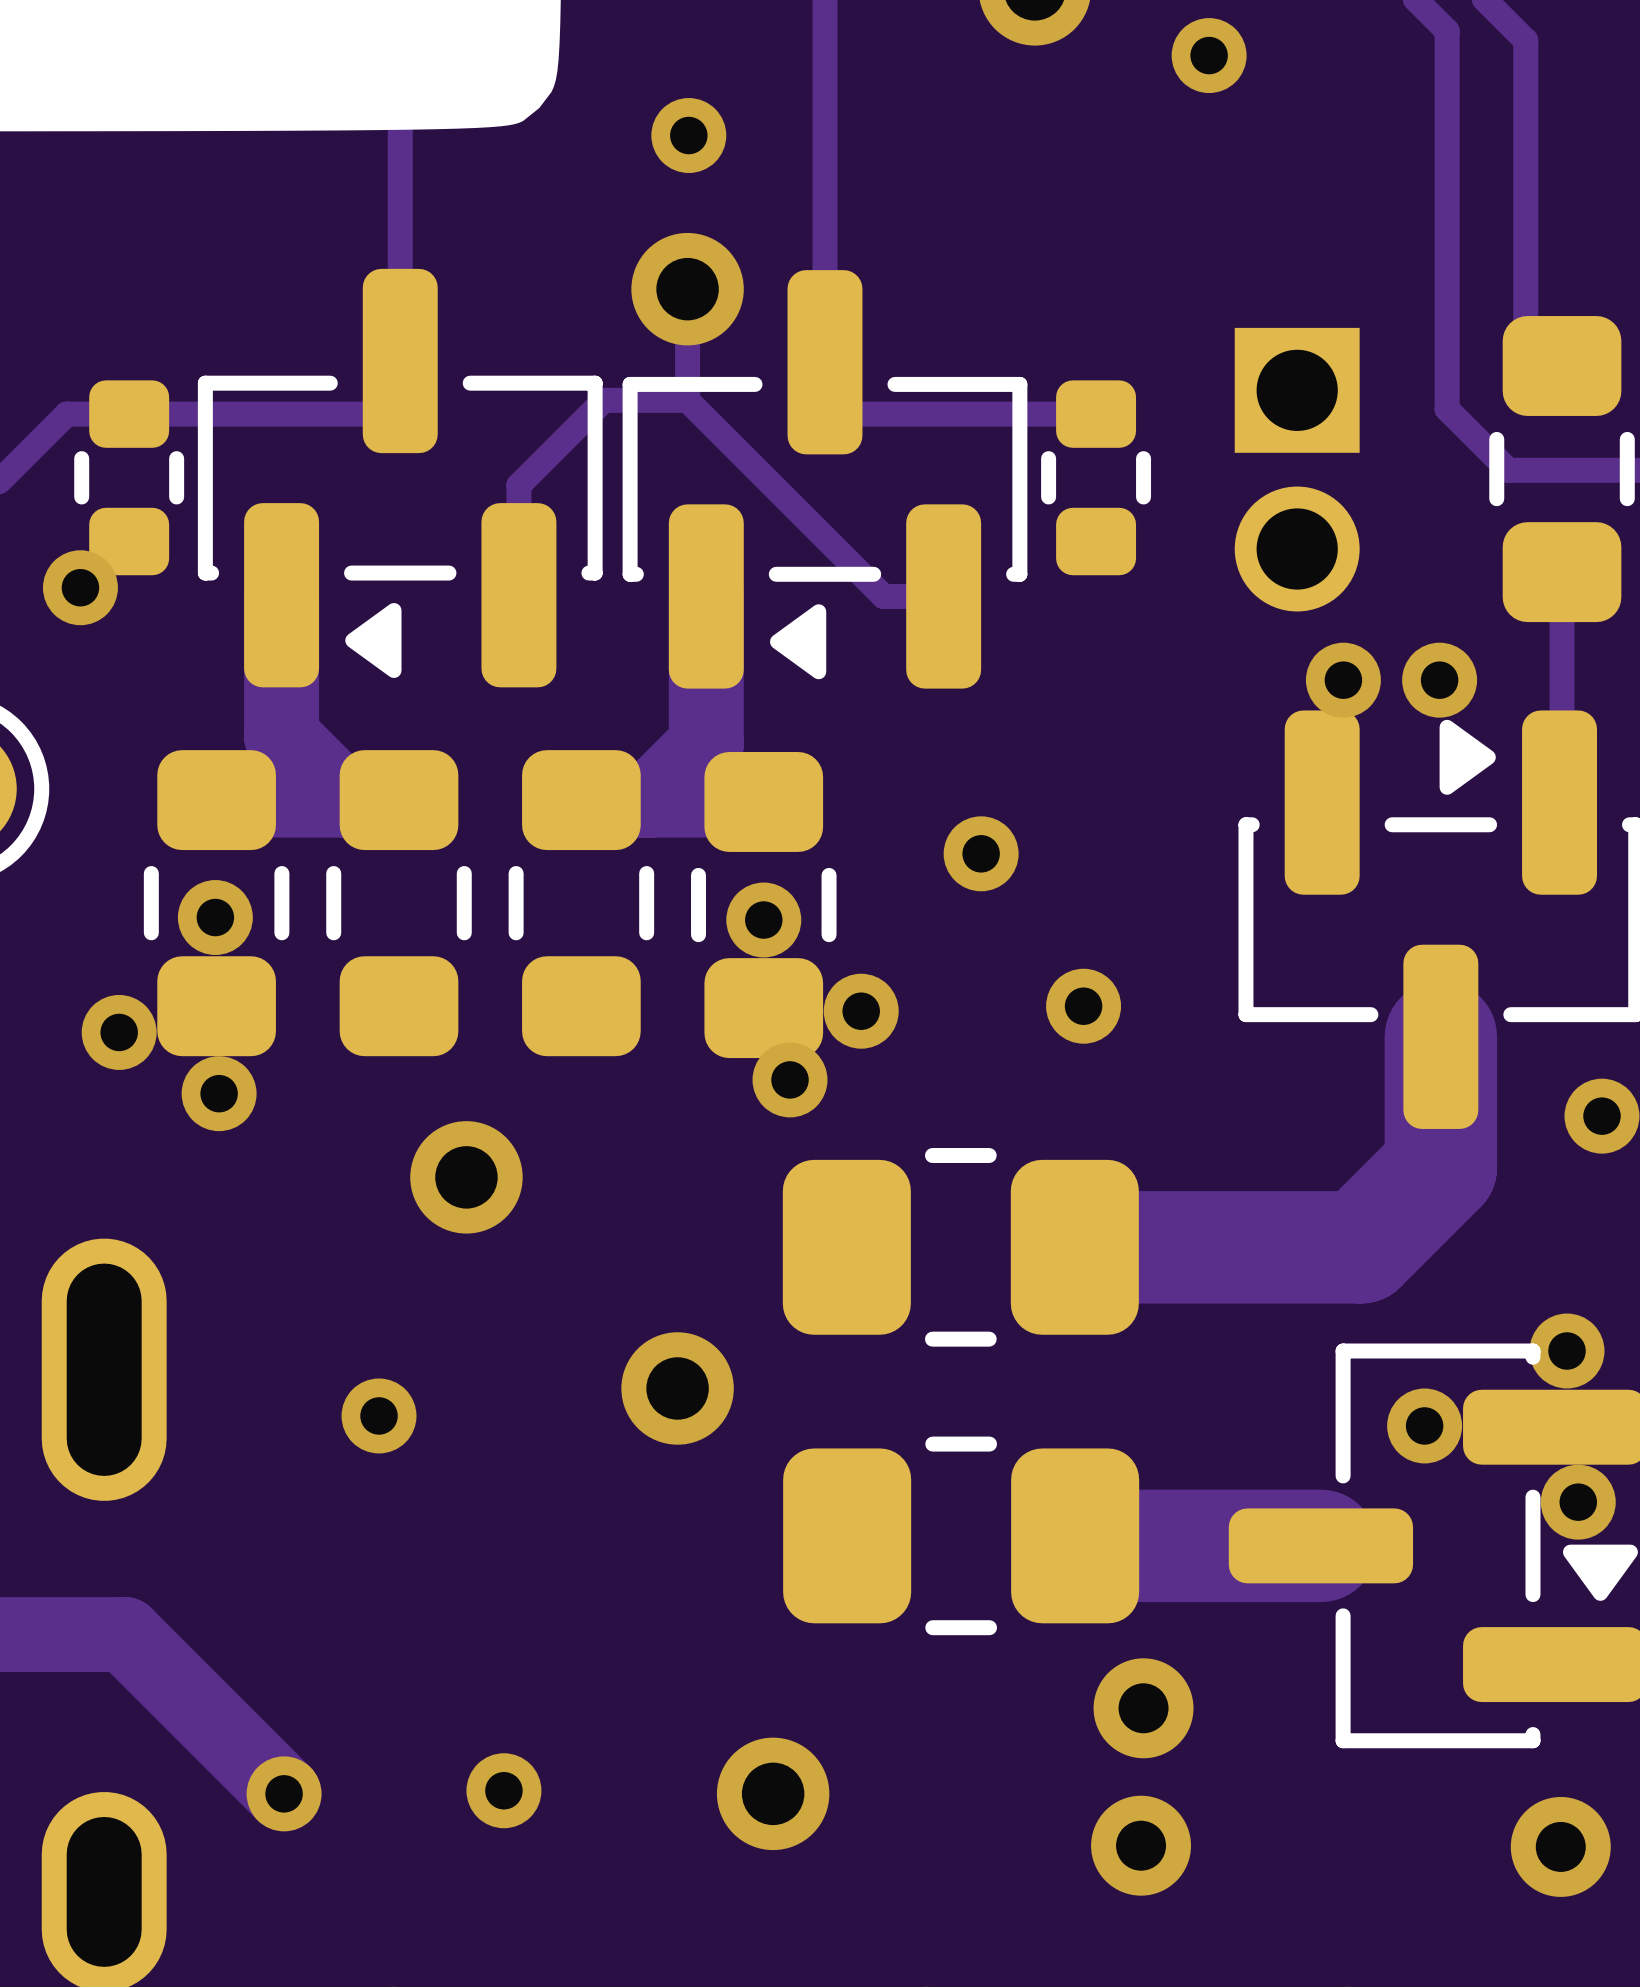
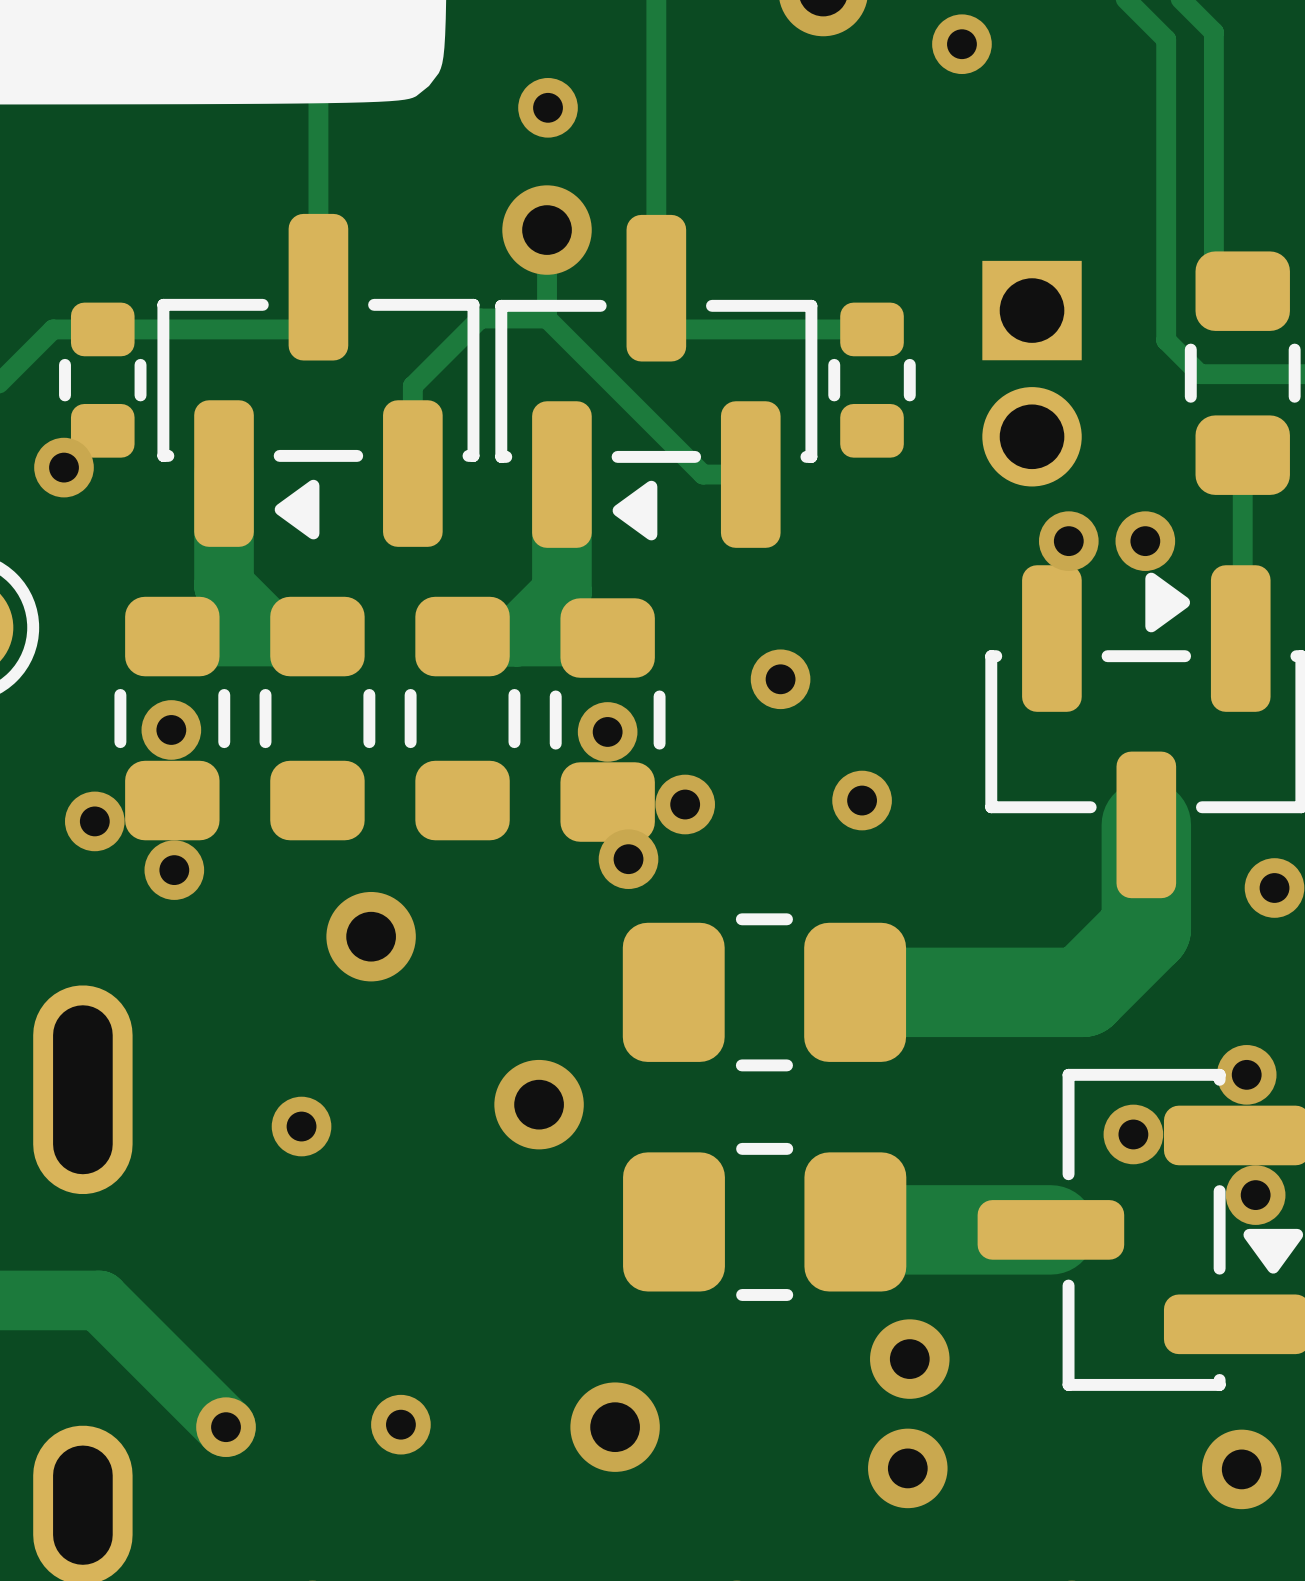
track: (1447, 30) (1447, 409) (1465, 427) -> (1151, 24) (1166, 39) (1166, 340)

